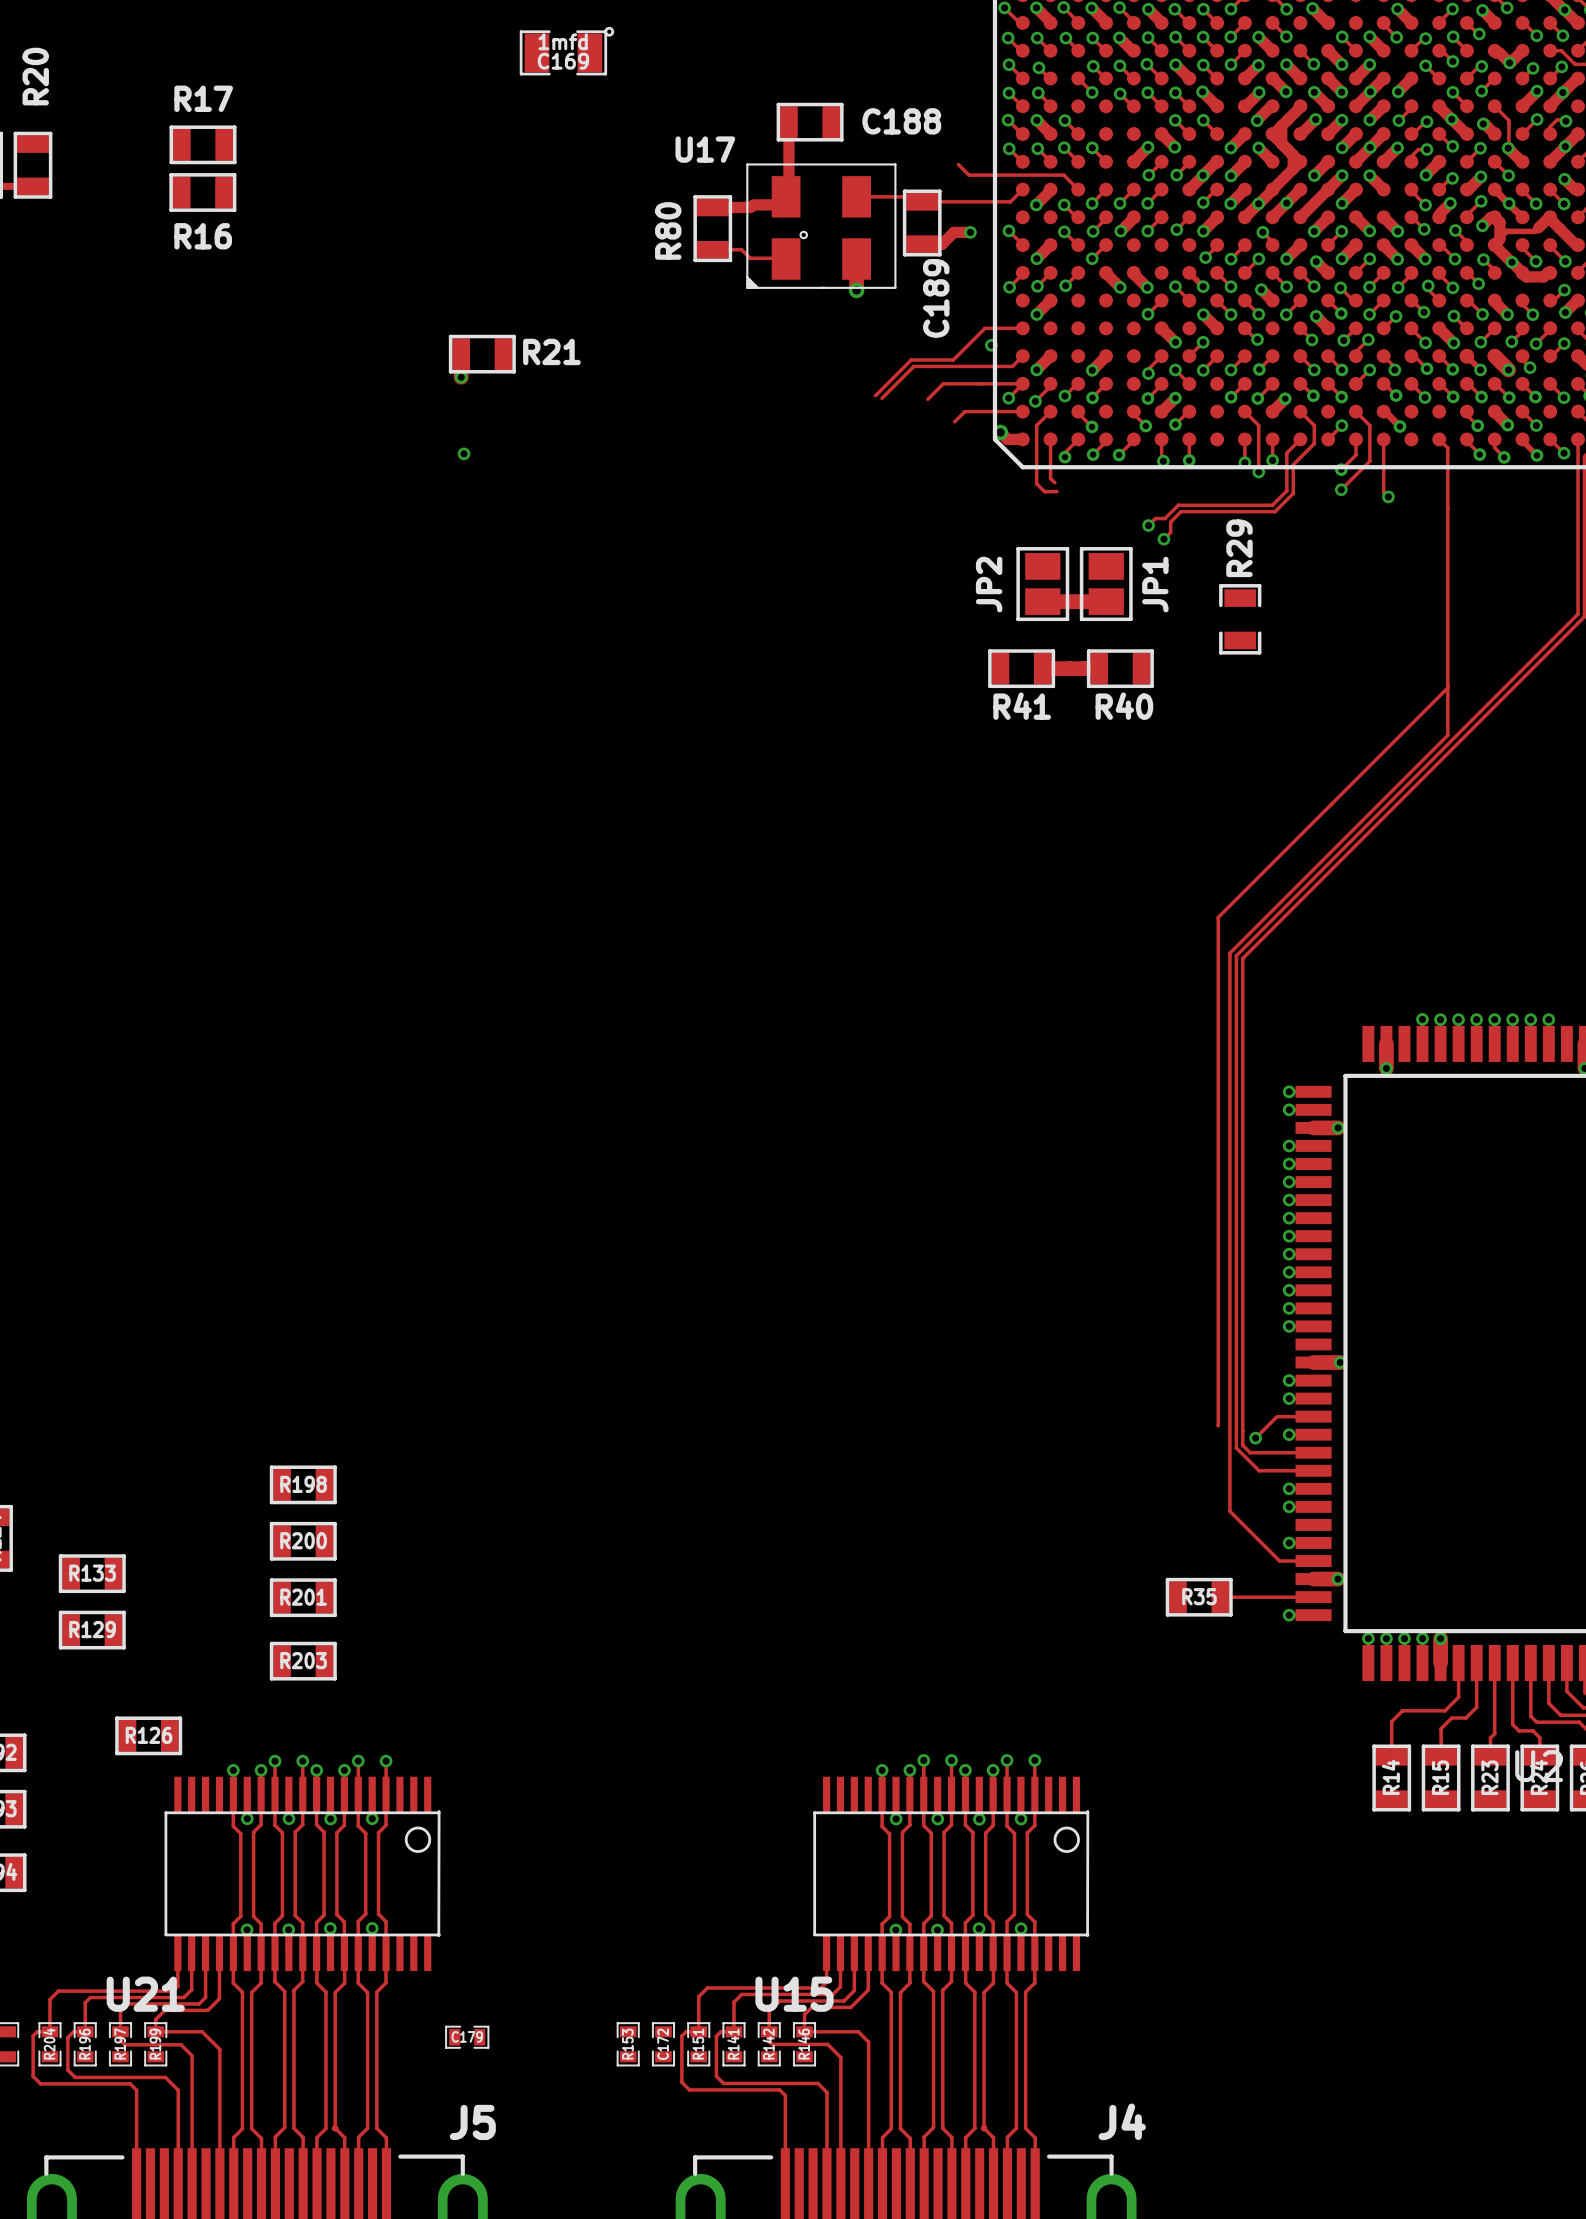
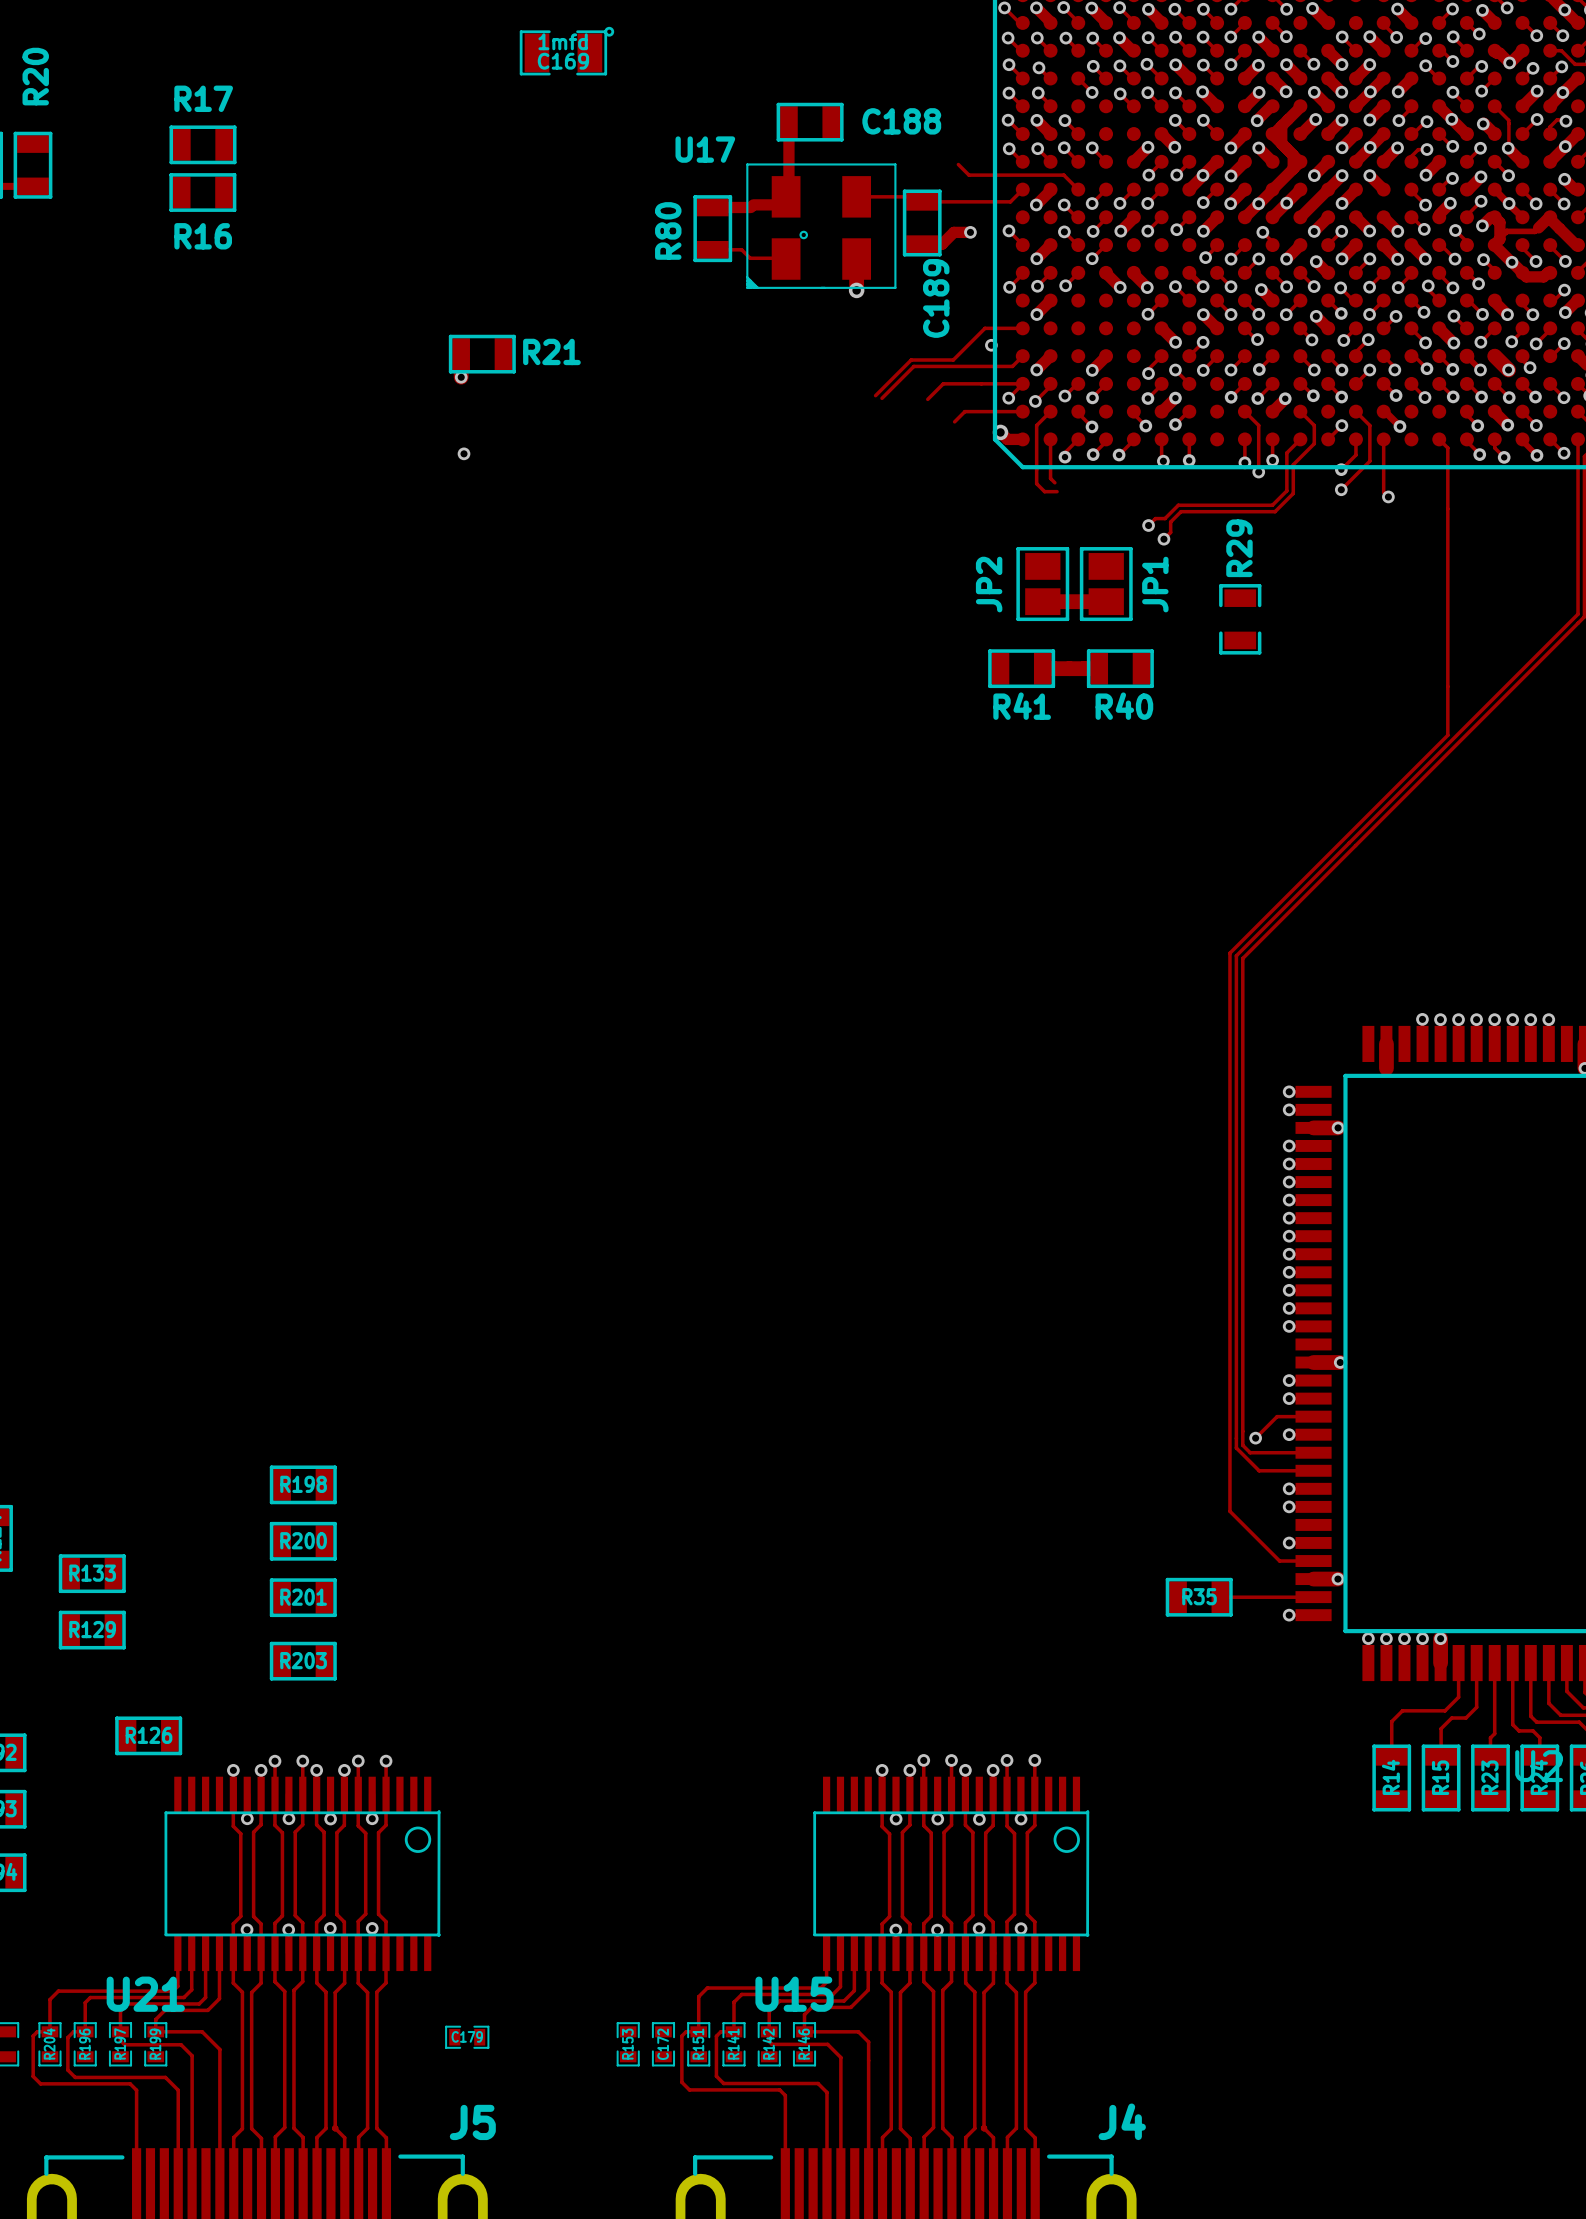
track: (1447, 687) (1218, 917) (1218, 1425) -> none
via: (1386, 1068) -> none

